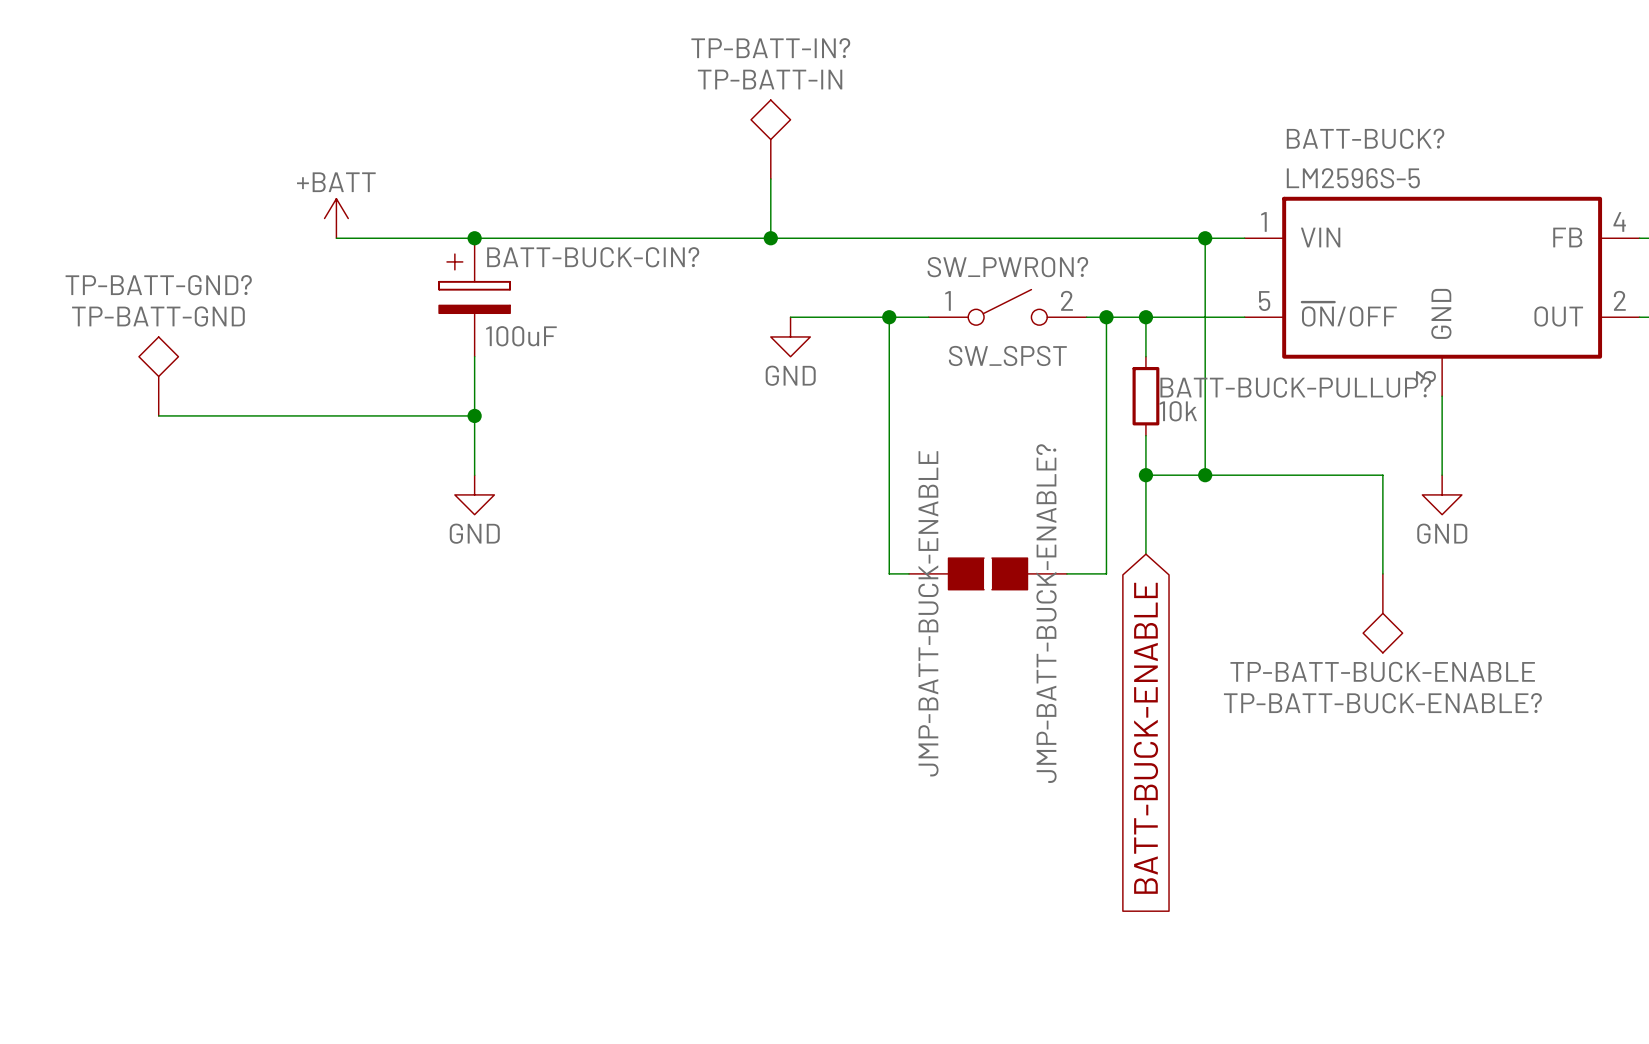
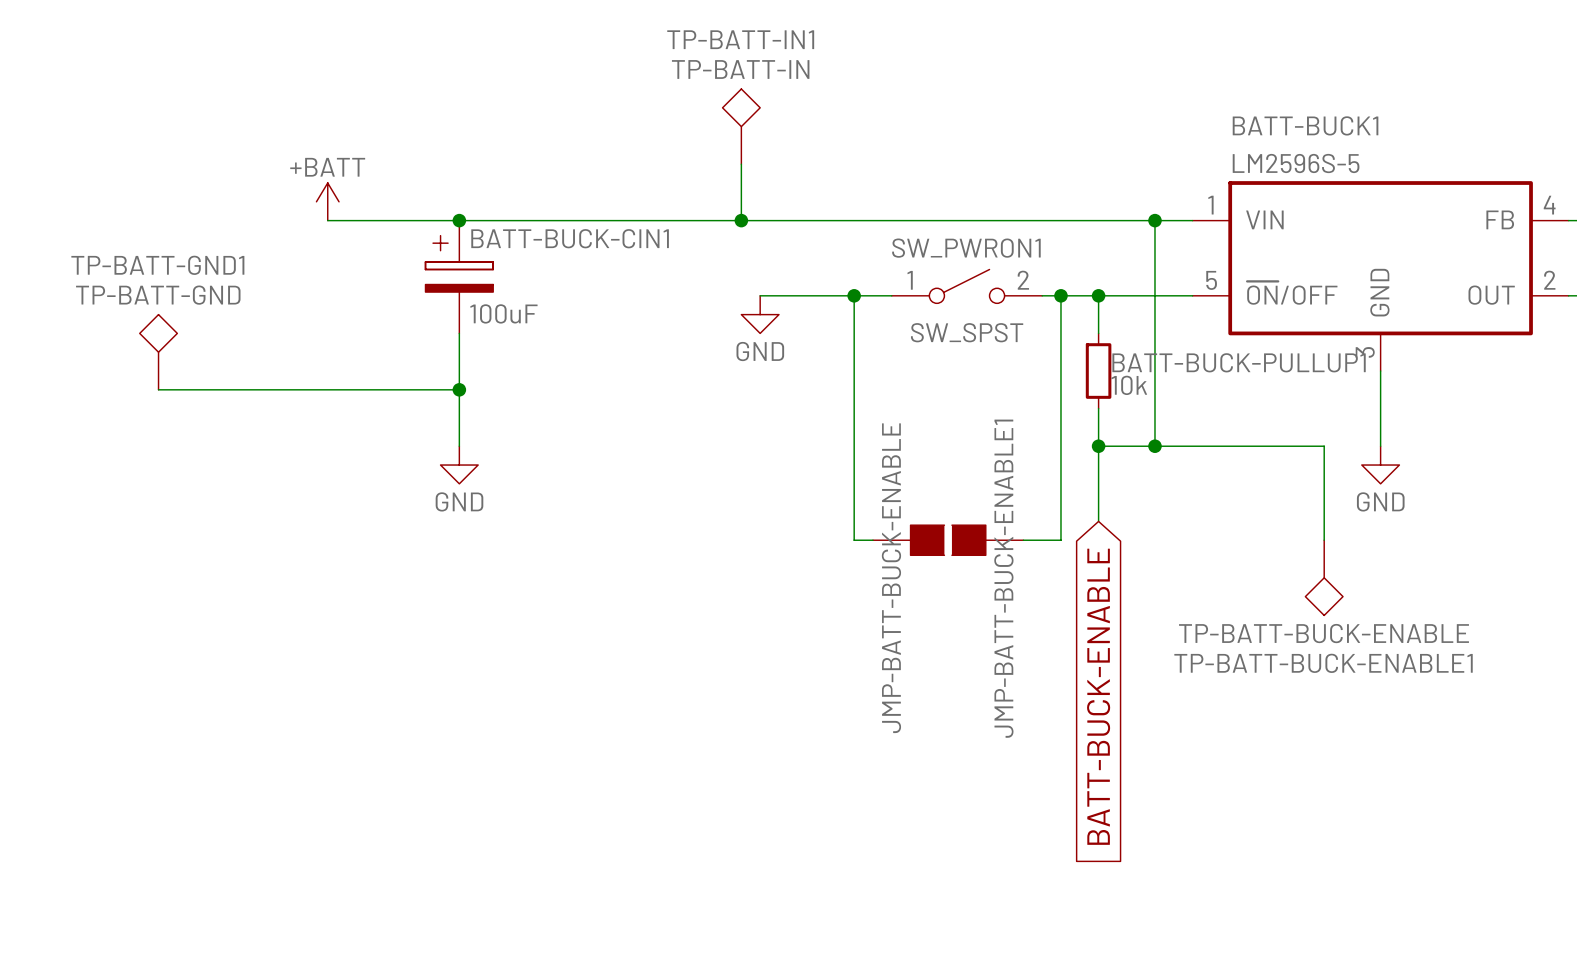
TP-BATT-IN? name: TP-BATT-IN? (770, 48) -> TP-BATT-IN1 (740, 39)
BATT-BUCK? name: BATT-BUCK? (1365, 138) -> BATT-BUCK1 (1305, 125)
BATT-BUCK-CIN? name: BATT-BUCK-CIN? (593, 257) -> BATT-BUCK-CIN1 (570, 238)
SW_PWRON? name: SW_PWRON? (1007, 267) -> SW_PWRON1 (966, 248)
TP-BATT-GND? name: TP-BATT-GND? (158, 285) -> TP-BATT-GND1 (157, 265)
BATT-BUCK-PULLUP? name: BATT-BUCK-PULLUP? (1295, 387) -> BATT-BUCK-PULLUP1 (1239, 362)
JMP-BATT-BUCK-ENABLE? name: JMP-BATT-BUCK-ENABLE? (1046, 613) -> JMP-BATT-BUCK-ENABLE1 (1003, 578)
TP-BATT-BUCK-ENABLE? name: TP-BATT-BUCK-ENABLE? (1382, 703) -> TP-BATT-BUCK-ENABLE1 (1323, 663)

